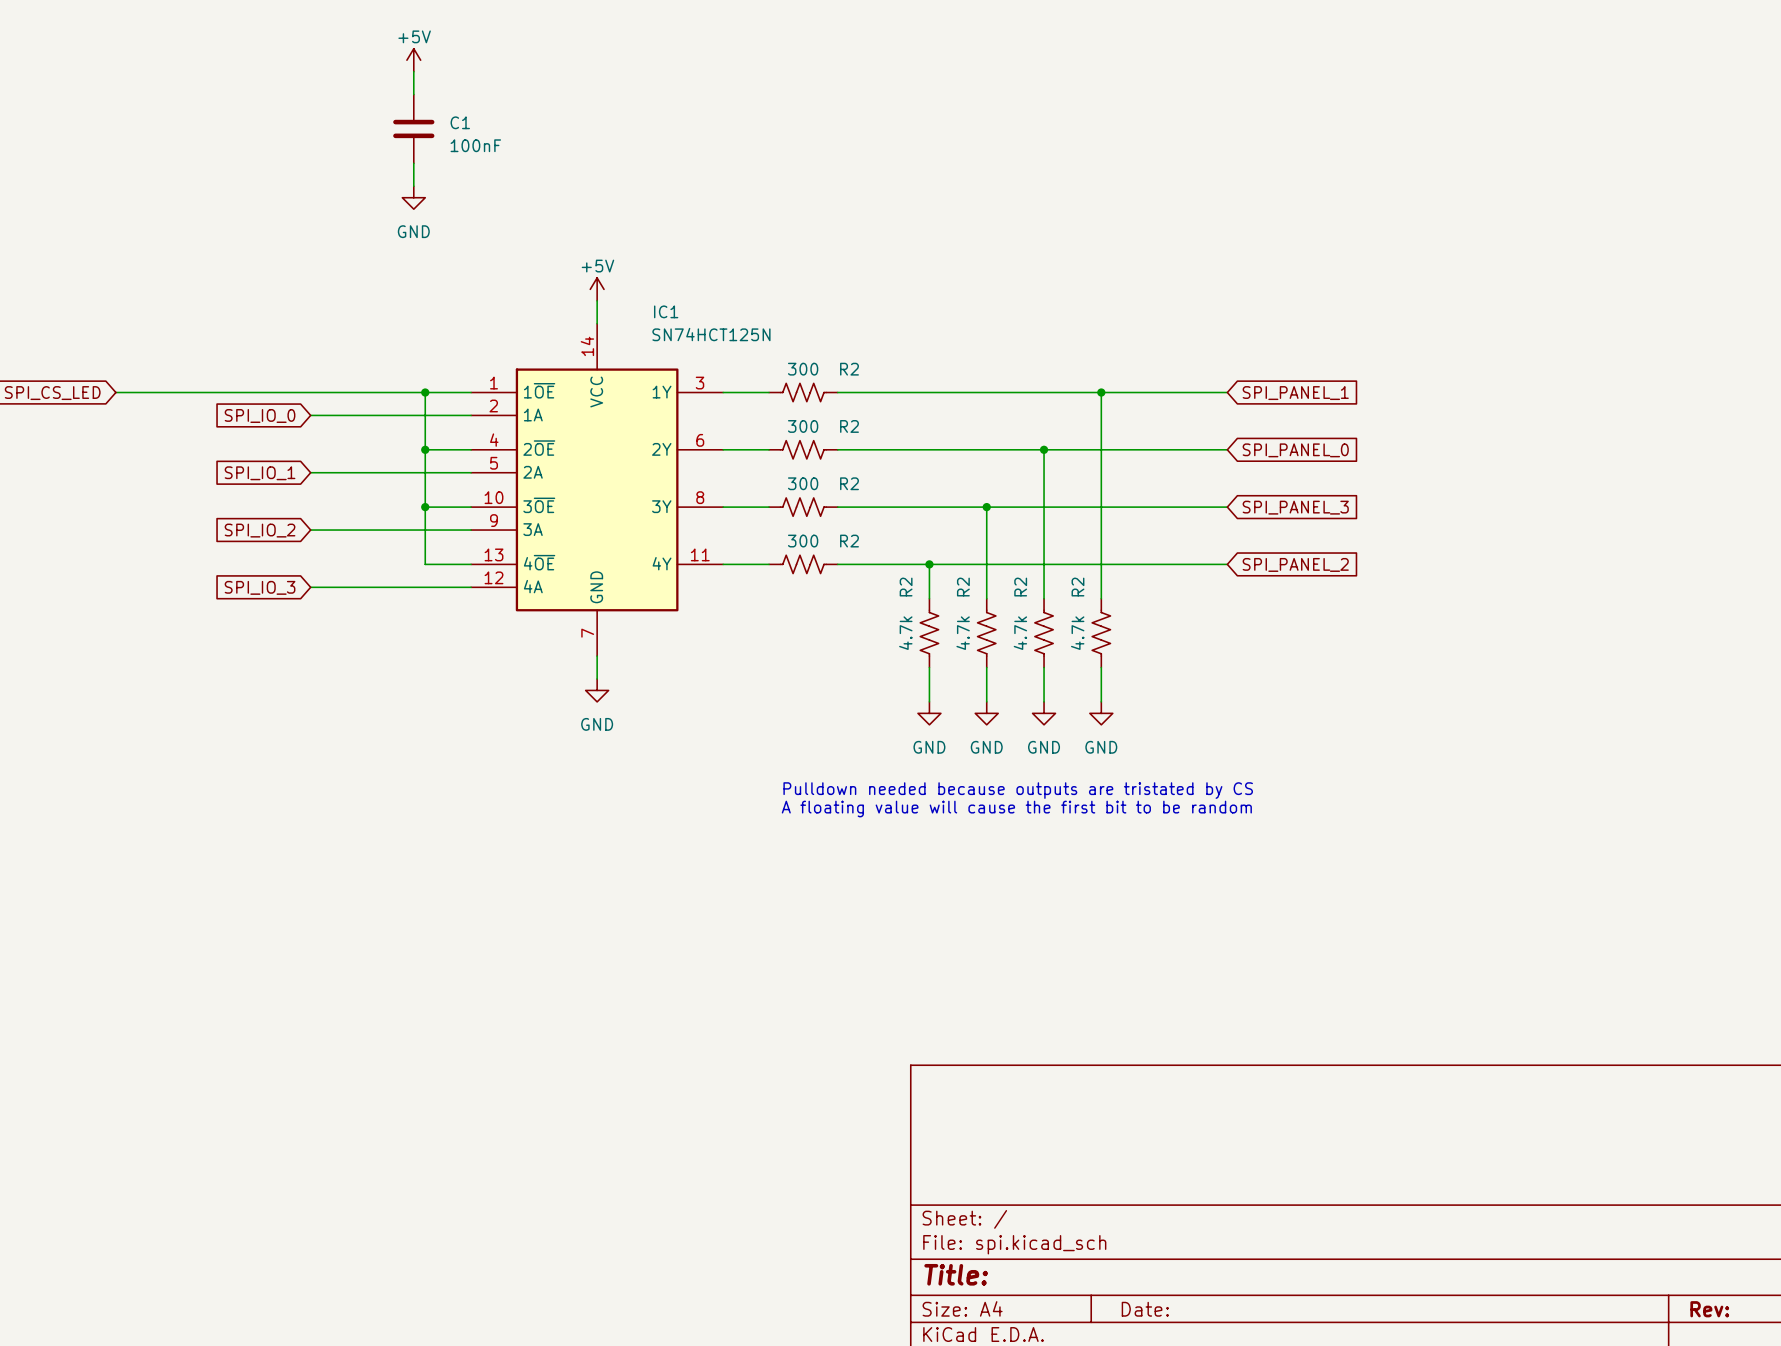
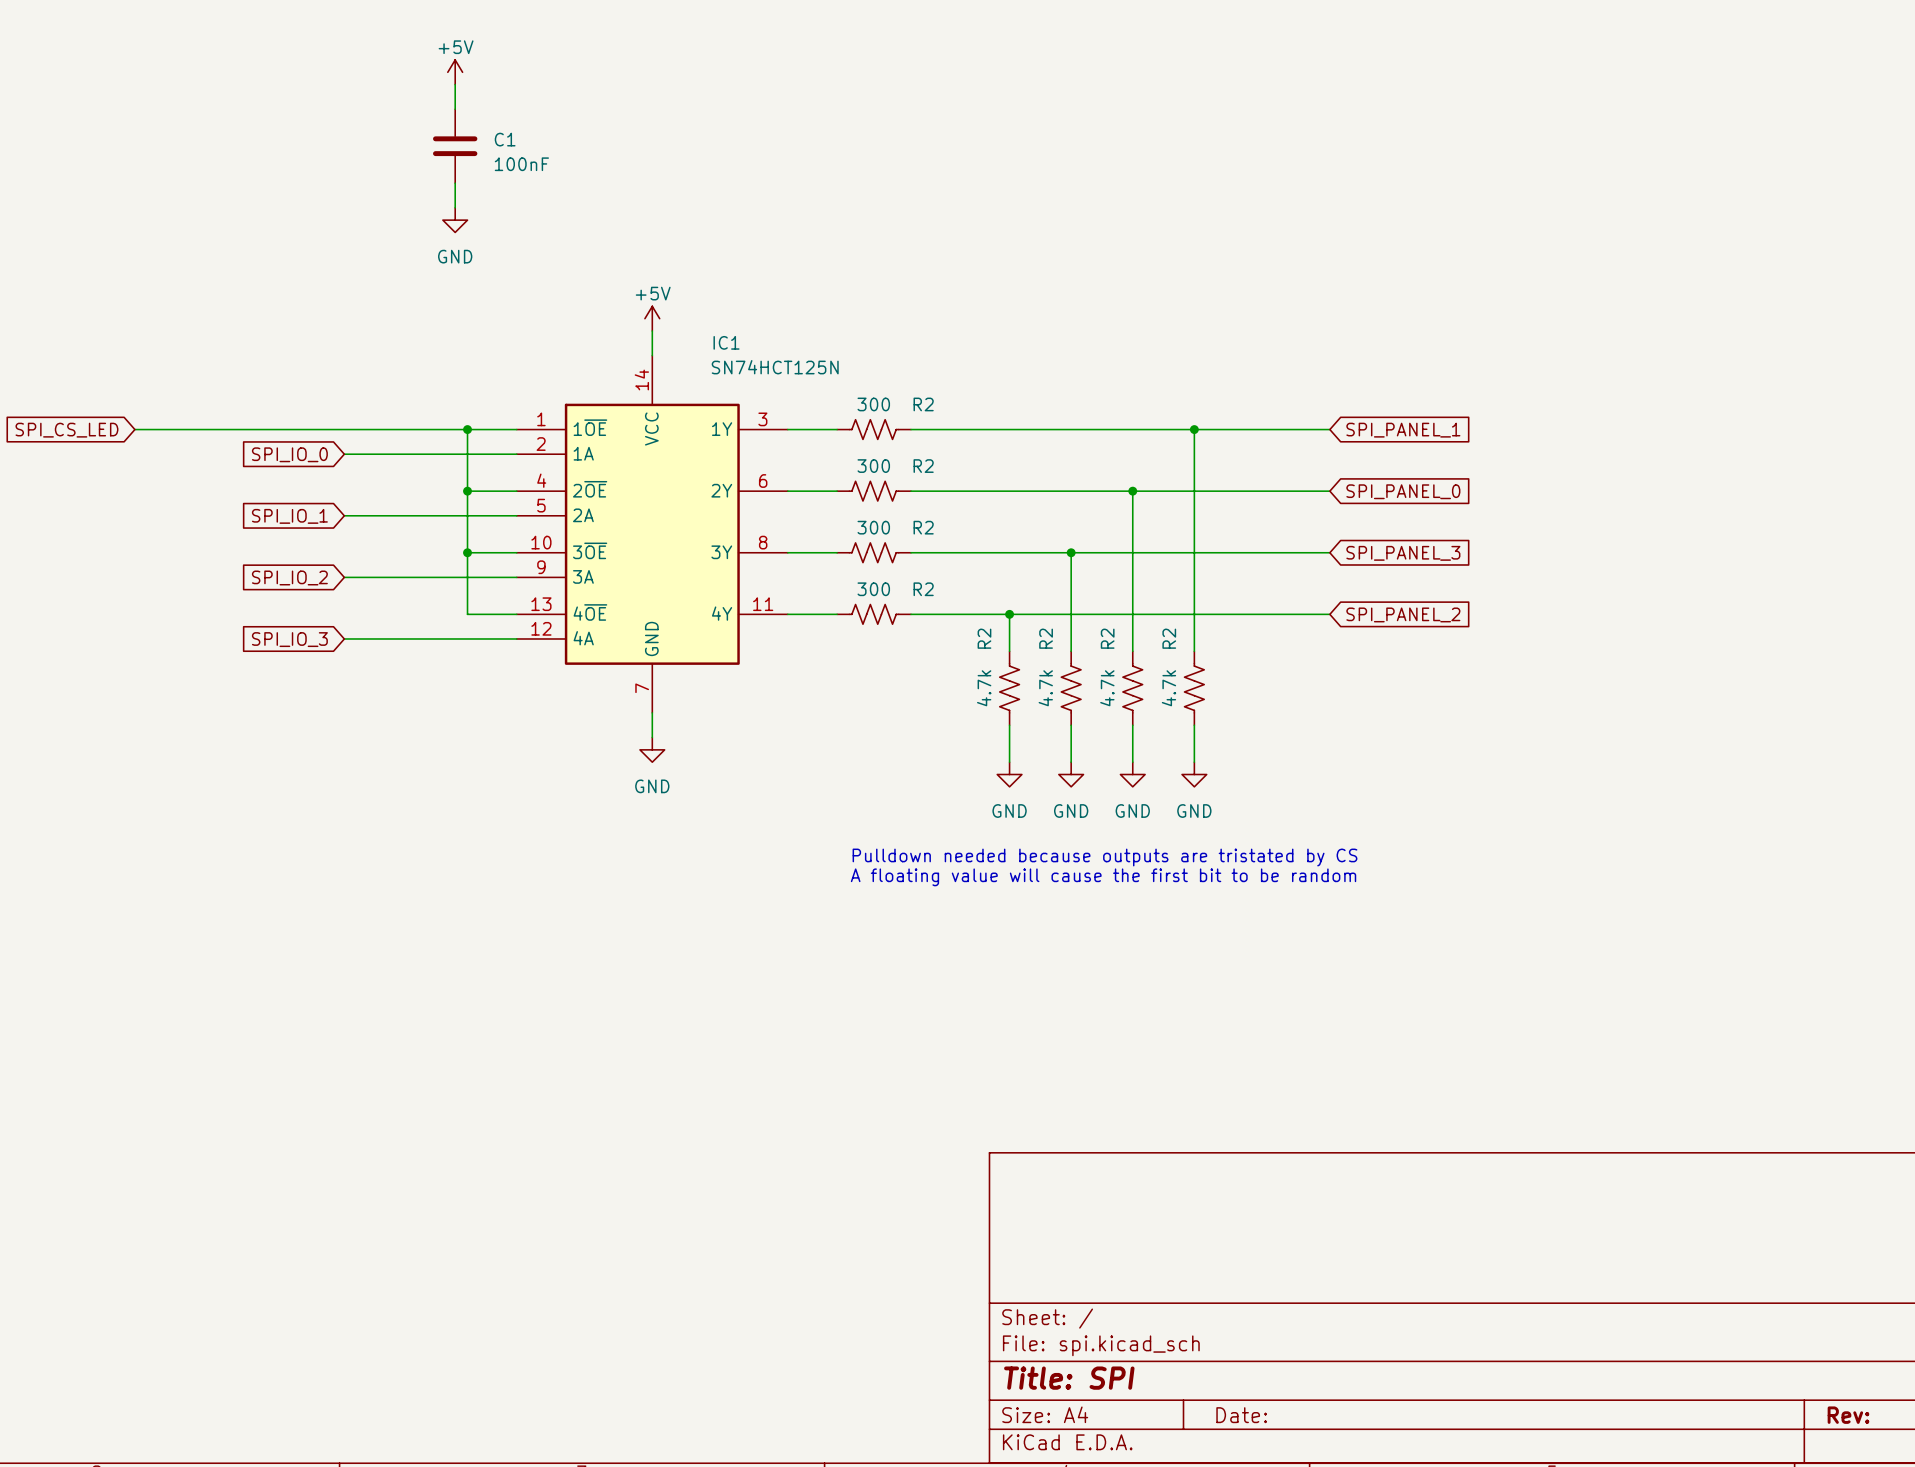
title block: Title: (956, 1274) -> Title: SPI (1069, 1378)

